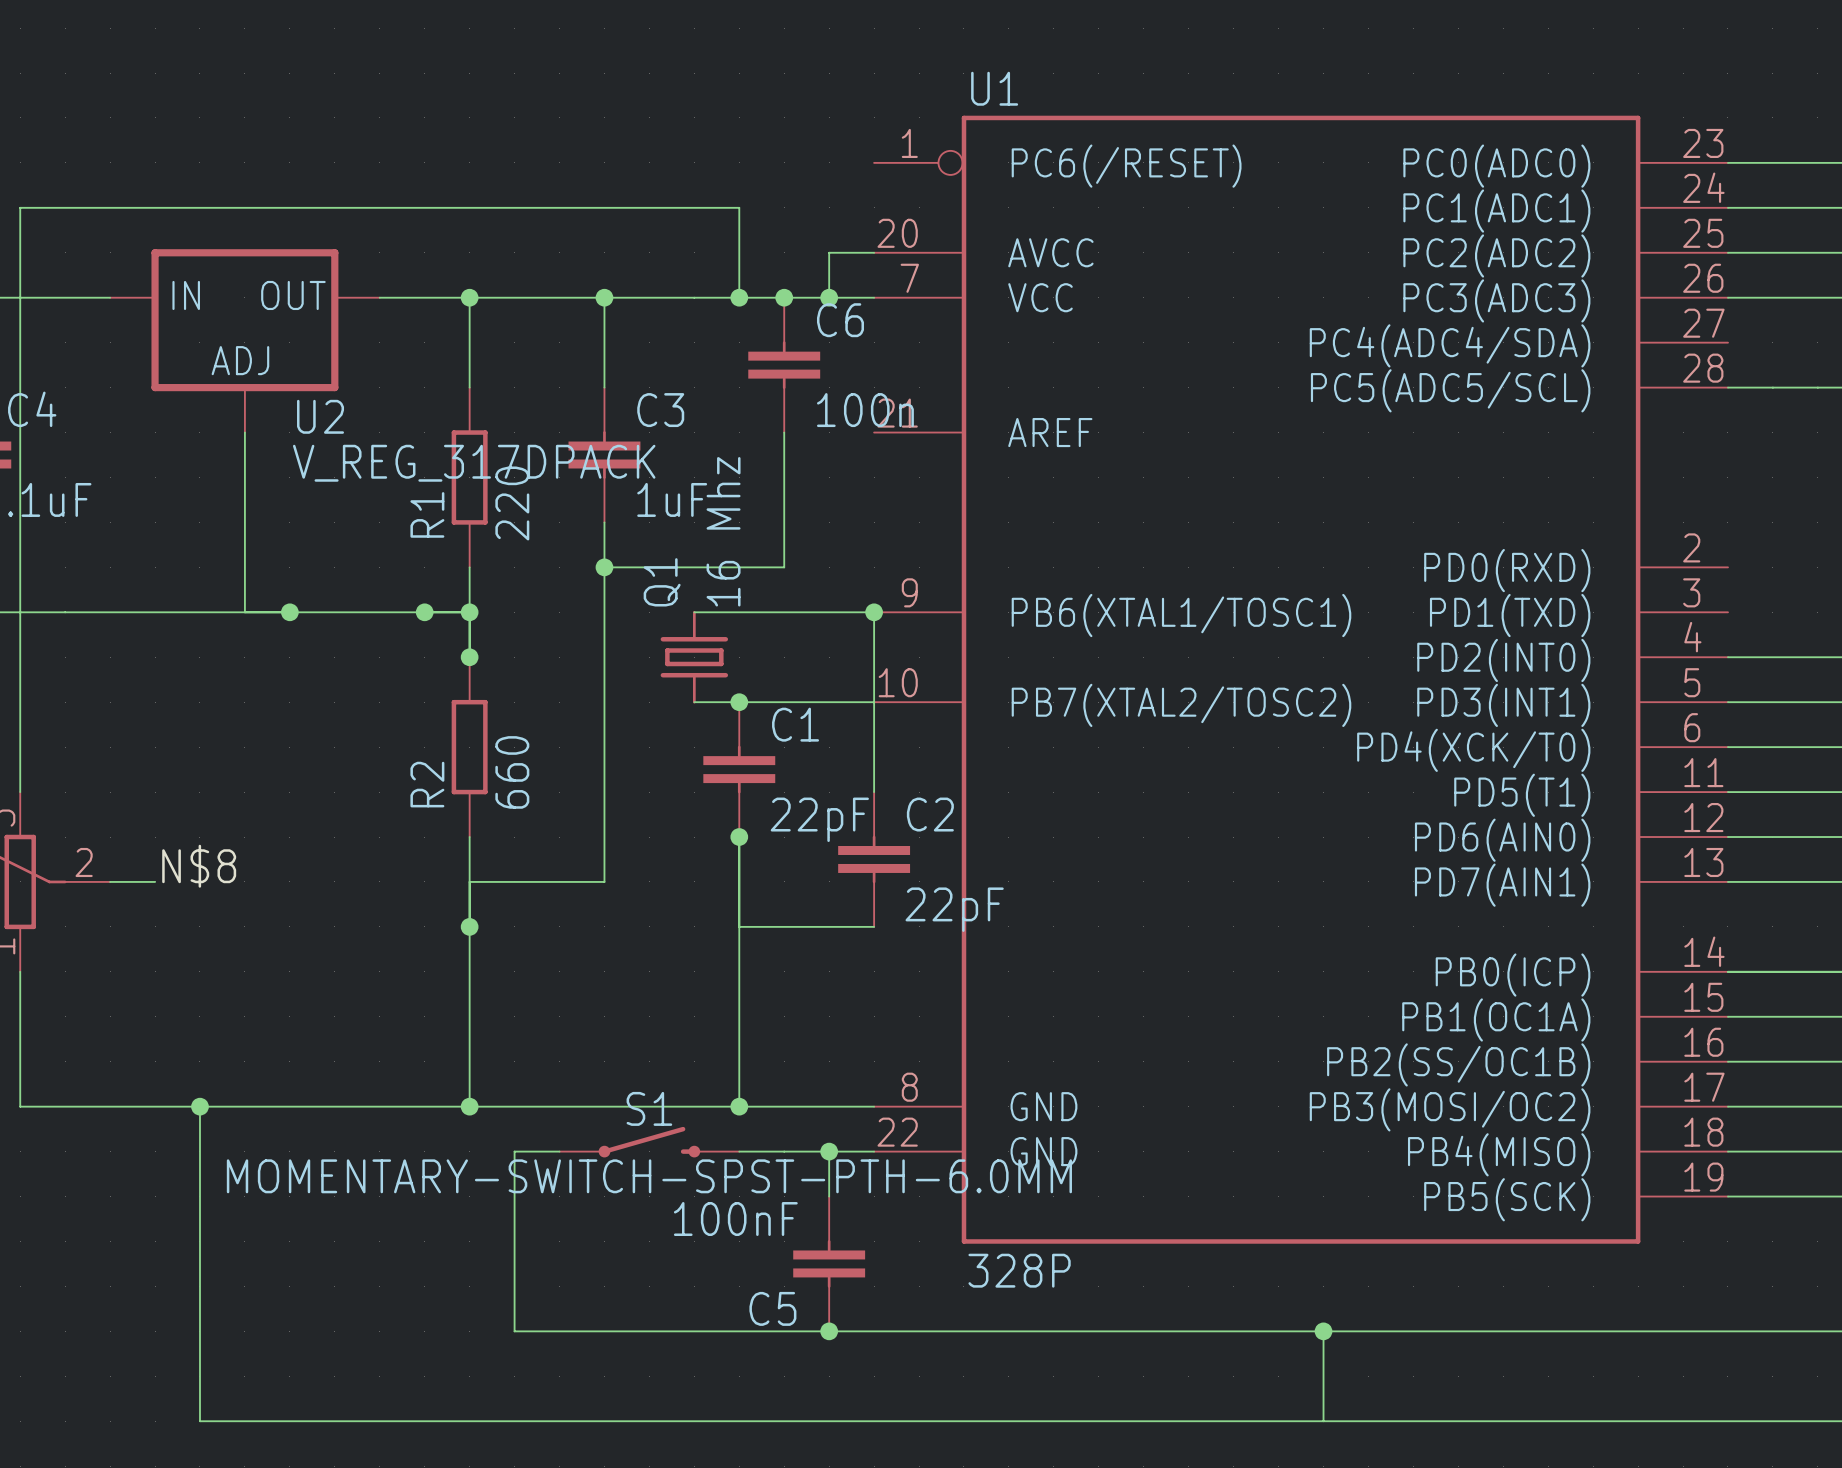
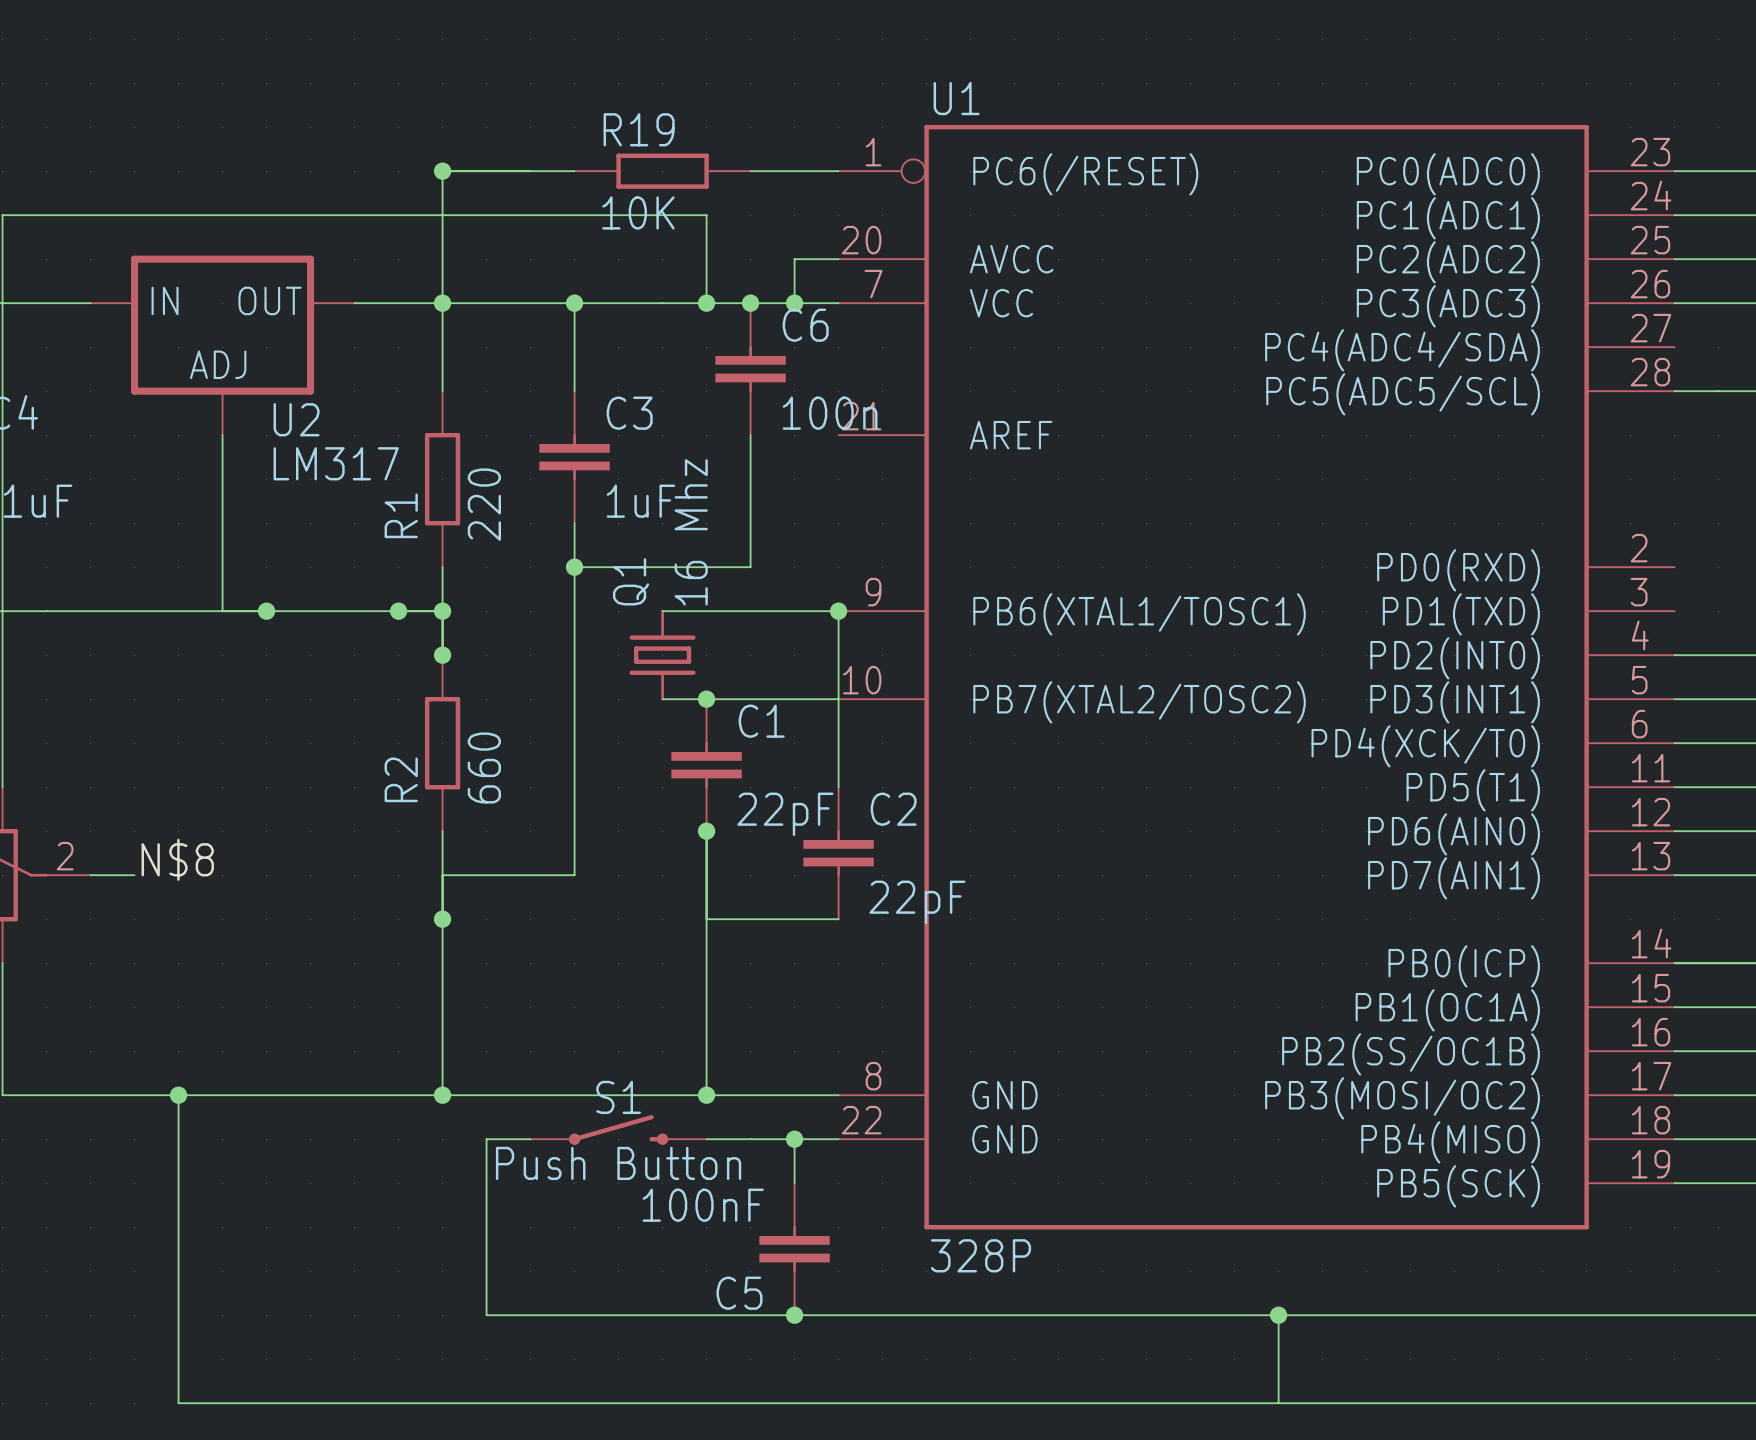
junction: none -> (442, 171)
wire: none -> (574, 171) (442, 171) (442, 303)
R19: none -> 10K (662, 171)
wire: none -> (750, 171) (838, 171)
U2 value: V_REG_317DPACK (474, 463) -> LM317 (336, 463)
S1 value: MOMENTARY-SWITCH-SPST-PTH-6.0MM (649, 1176) -> Push Button (618, 1163)

